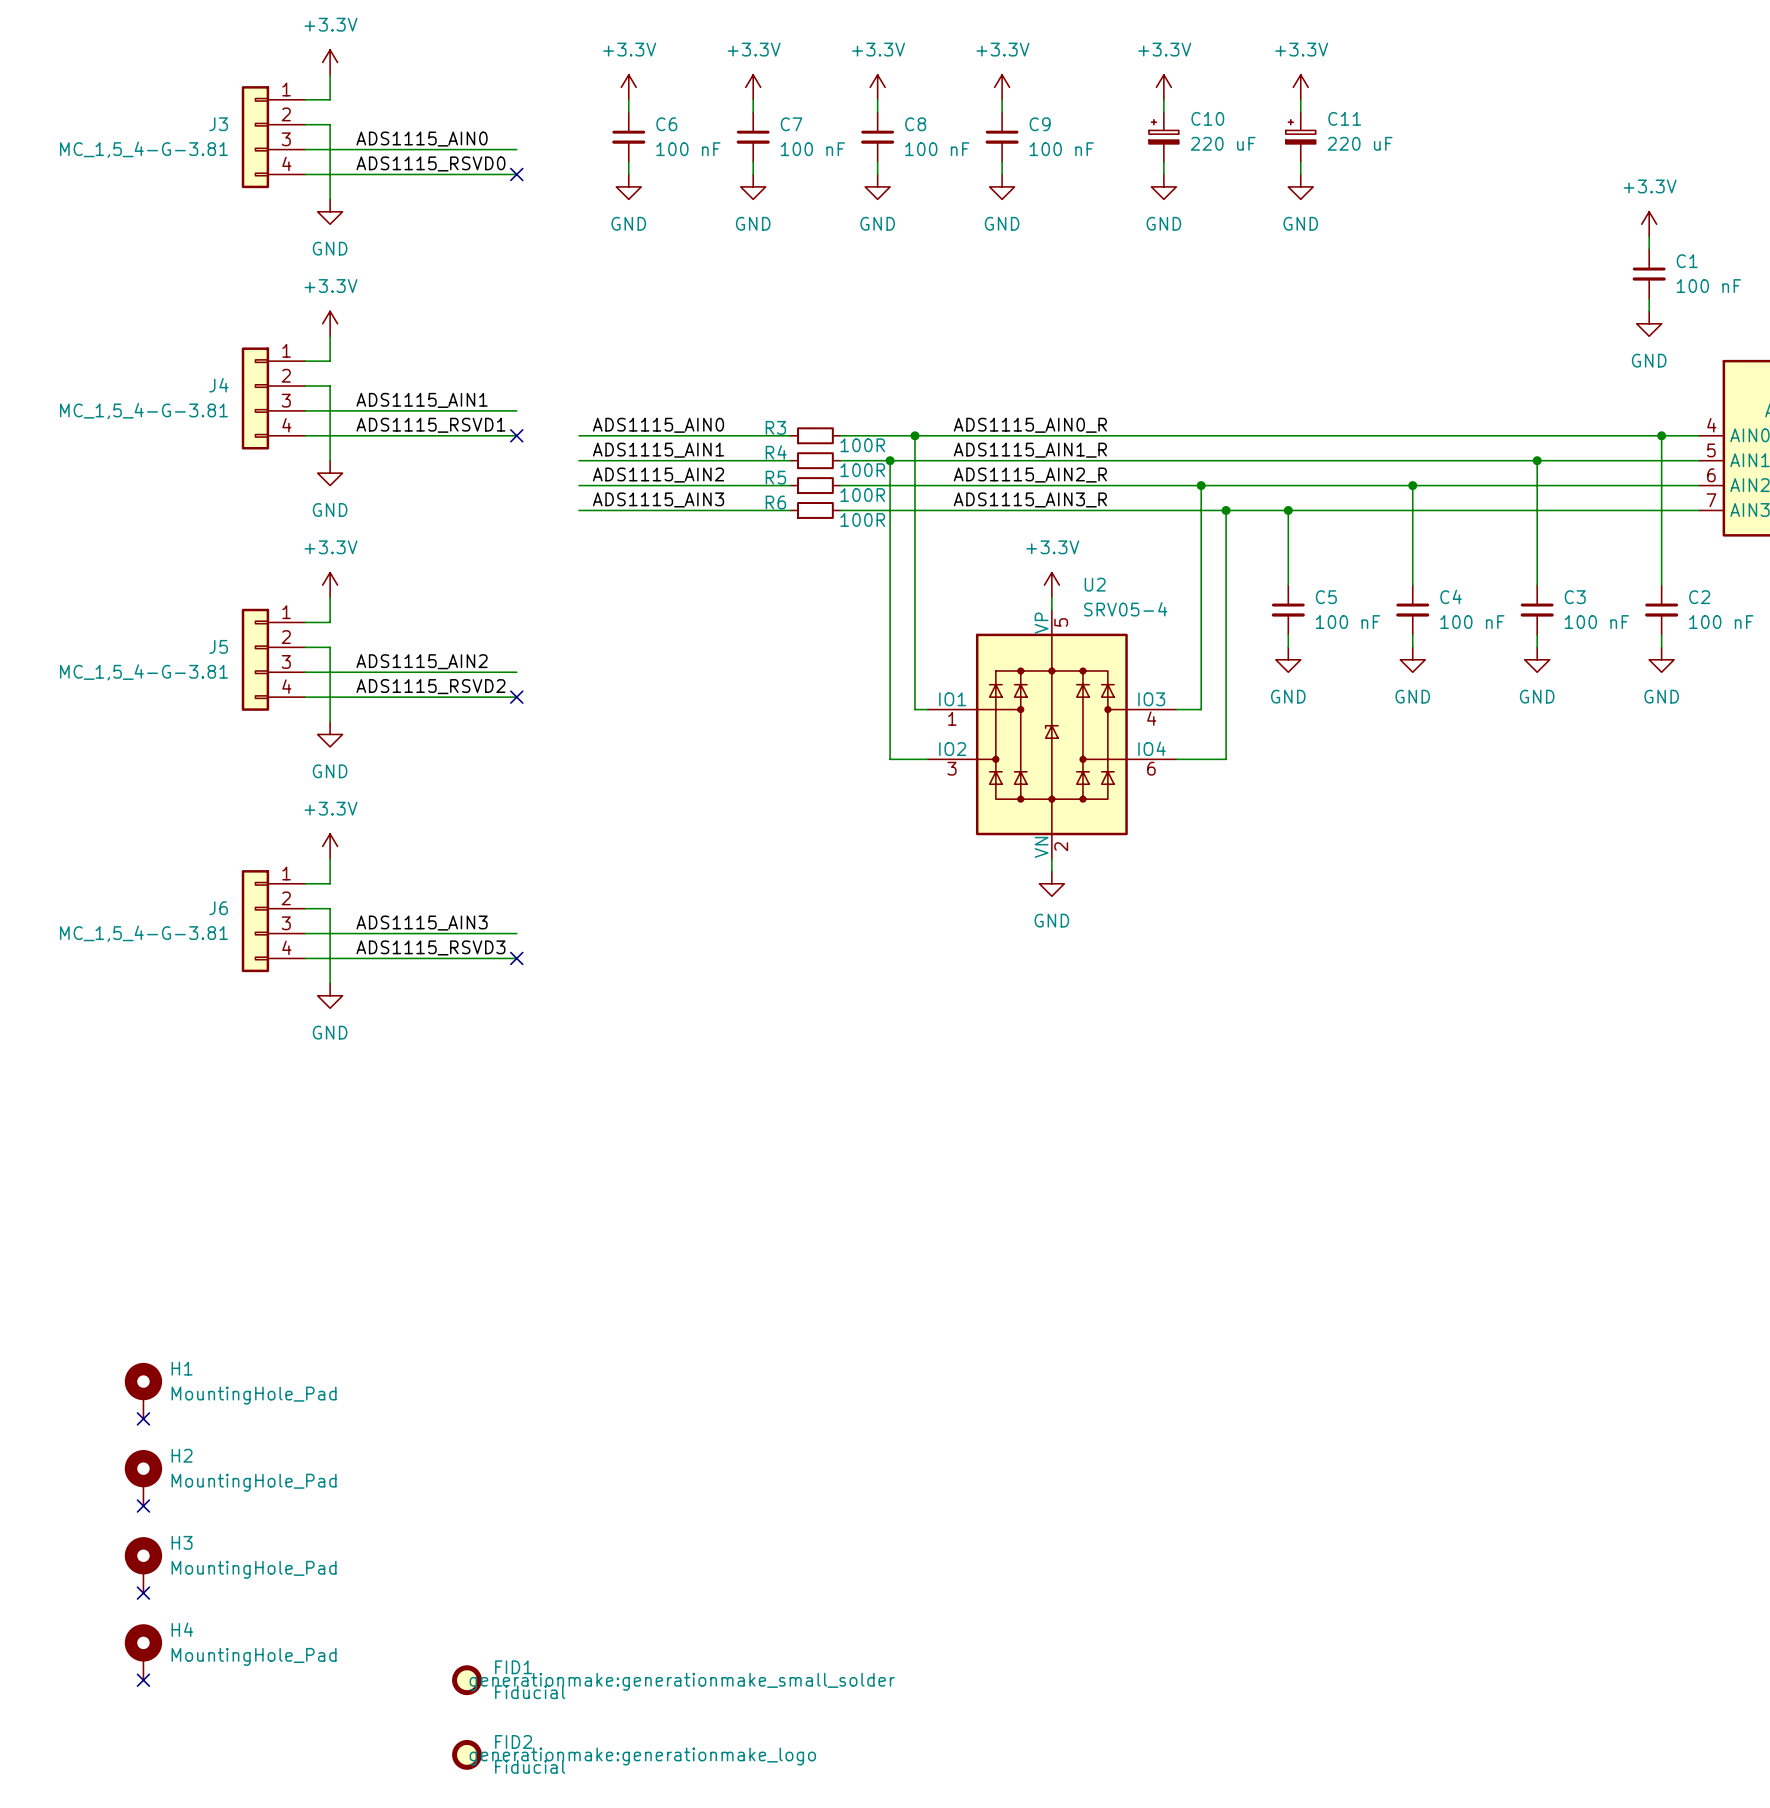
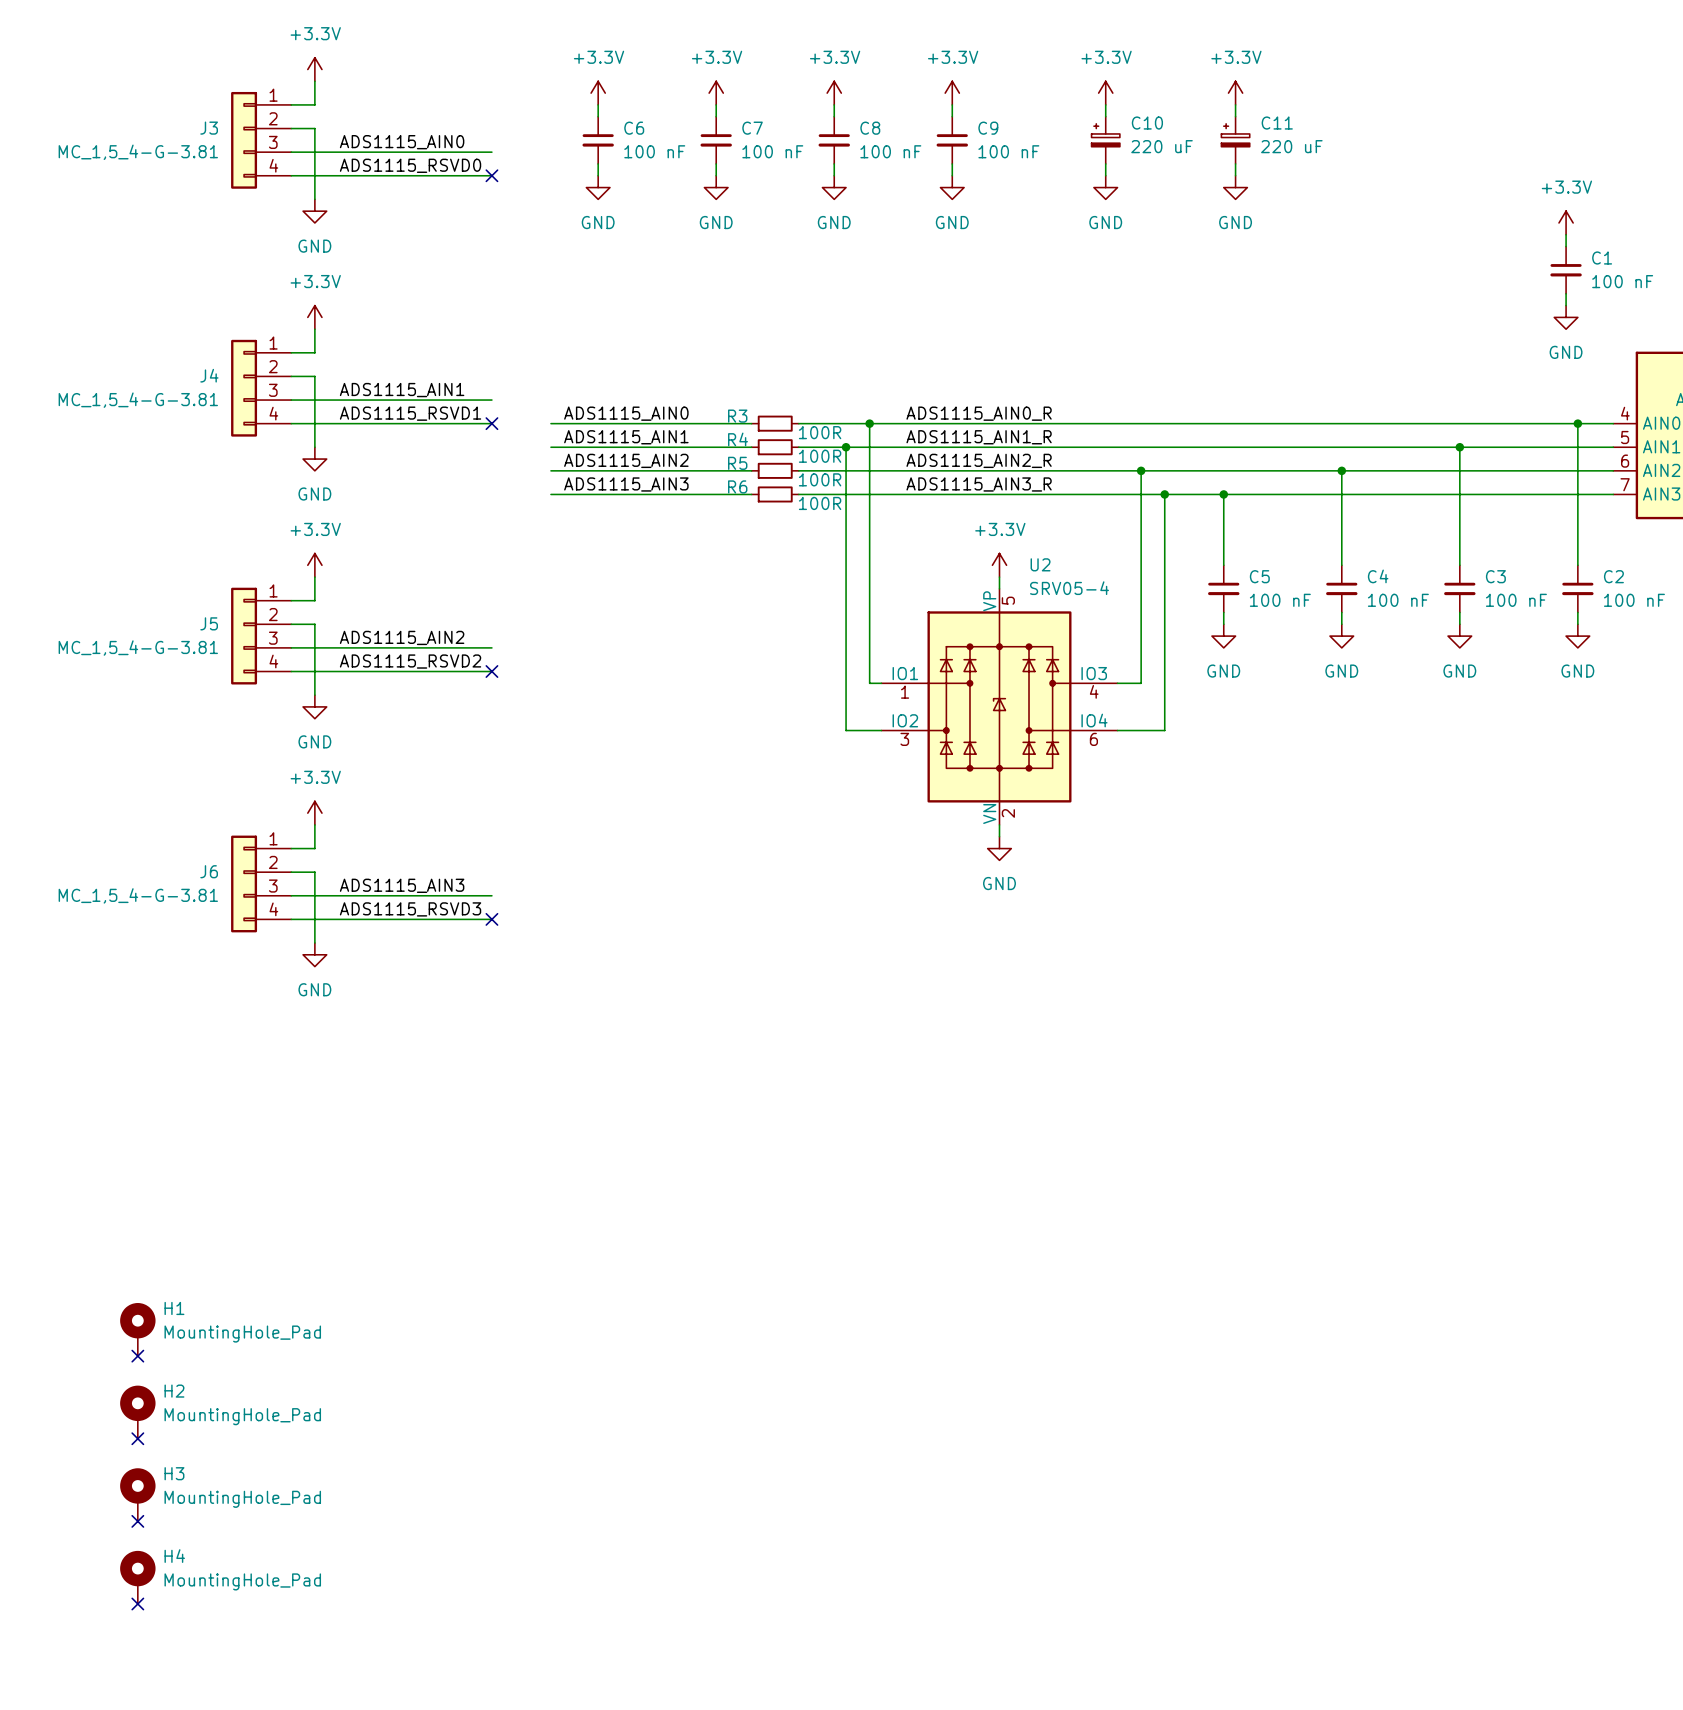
FID1: Fiducial (466, 1680) -> none
FID2: Fiducial (466, 1754) -> none

